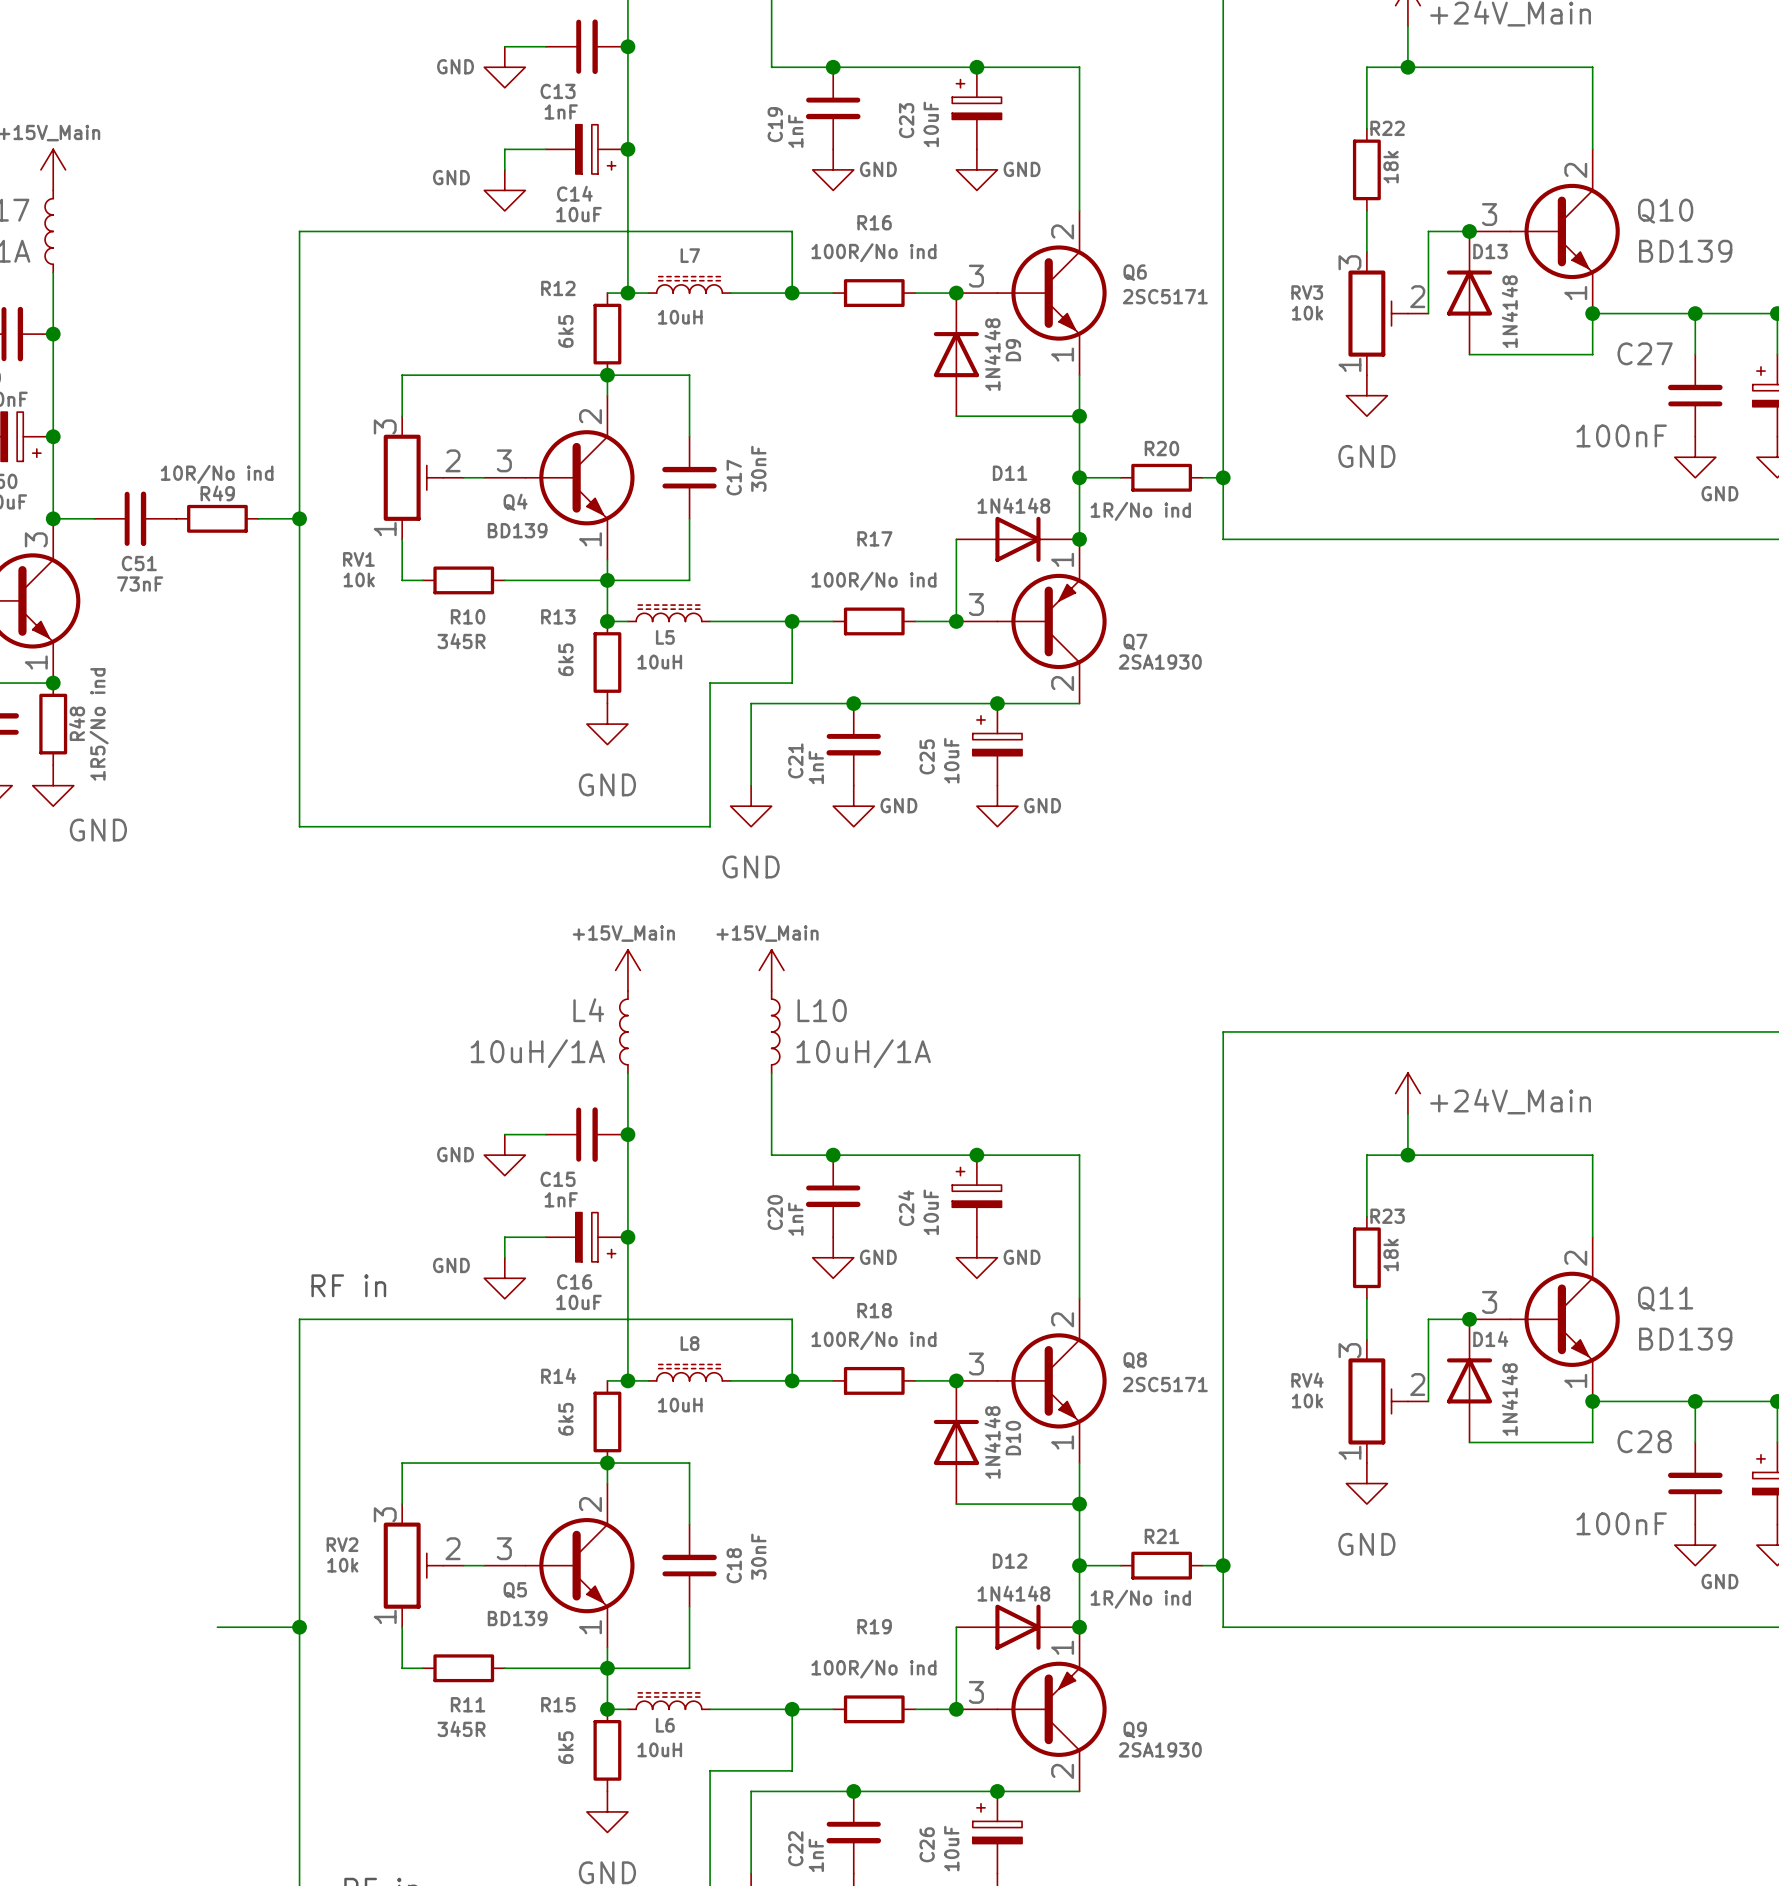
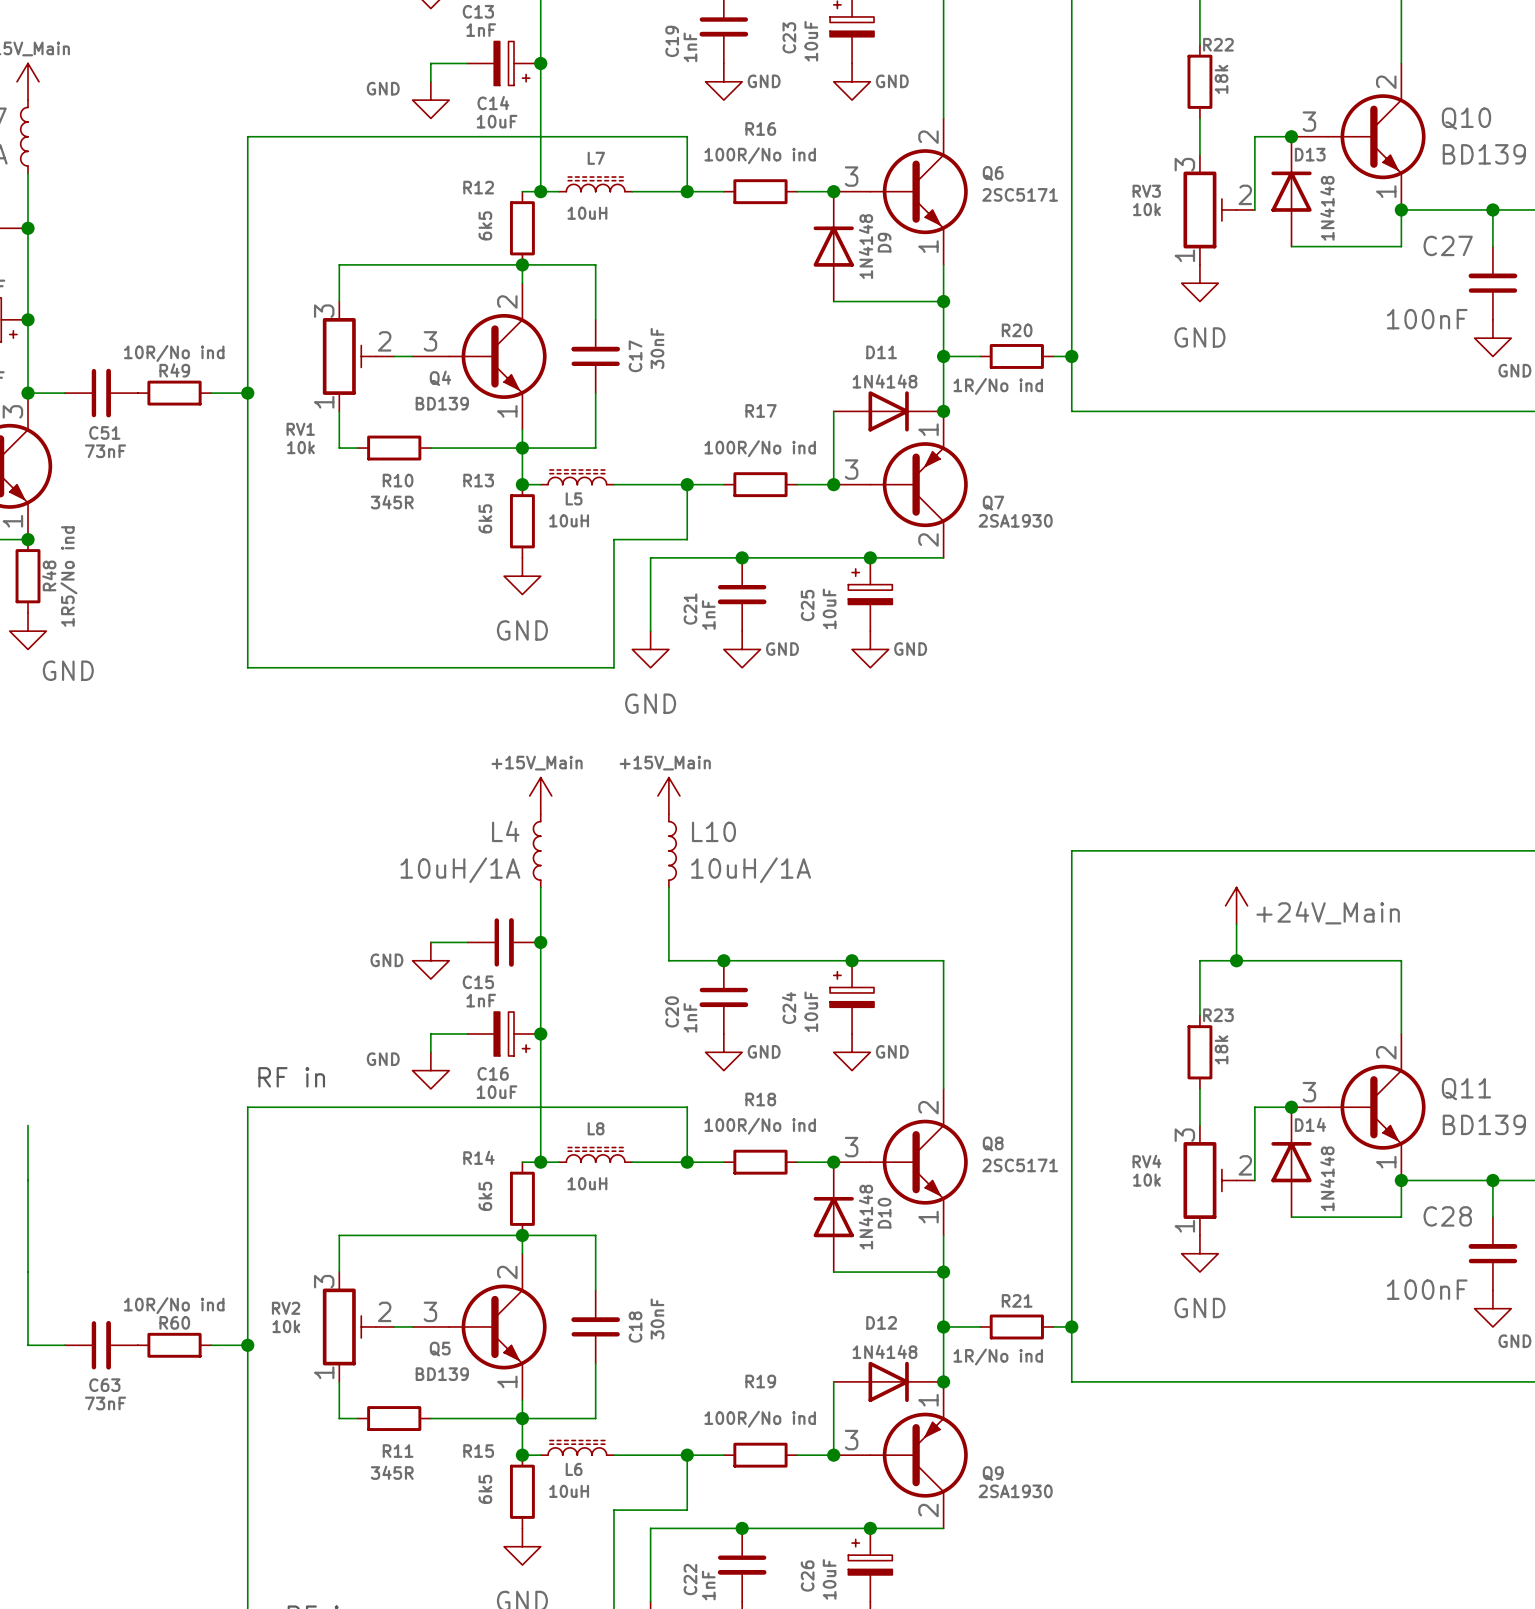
wire: none -> (28, 1125) (28, 1345) (64, 1345)
C63: none -> 73nF (101, 1345)
R60: none -> 10R/No ind (174, 1345)
wire: none -> (211, 1345) (247, 1345)
wire: (217, 1627) (299, 1627) -> none
junction position: (299, 1627) -> (247, 1345)

